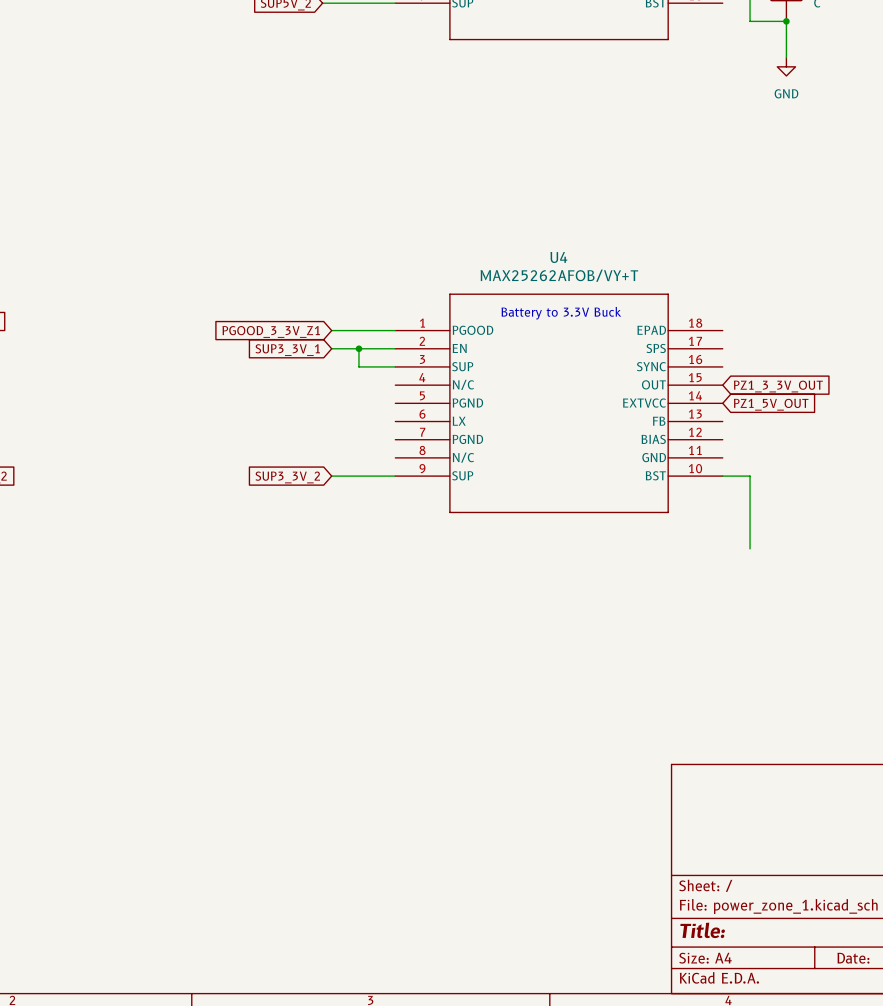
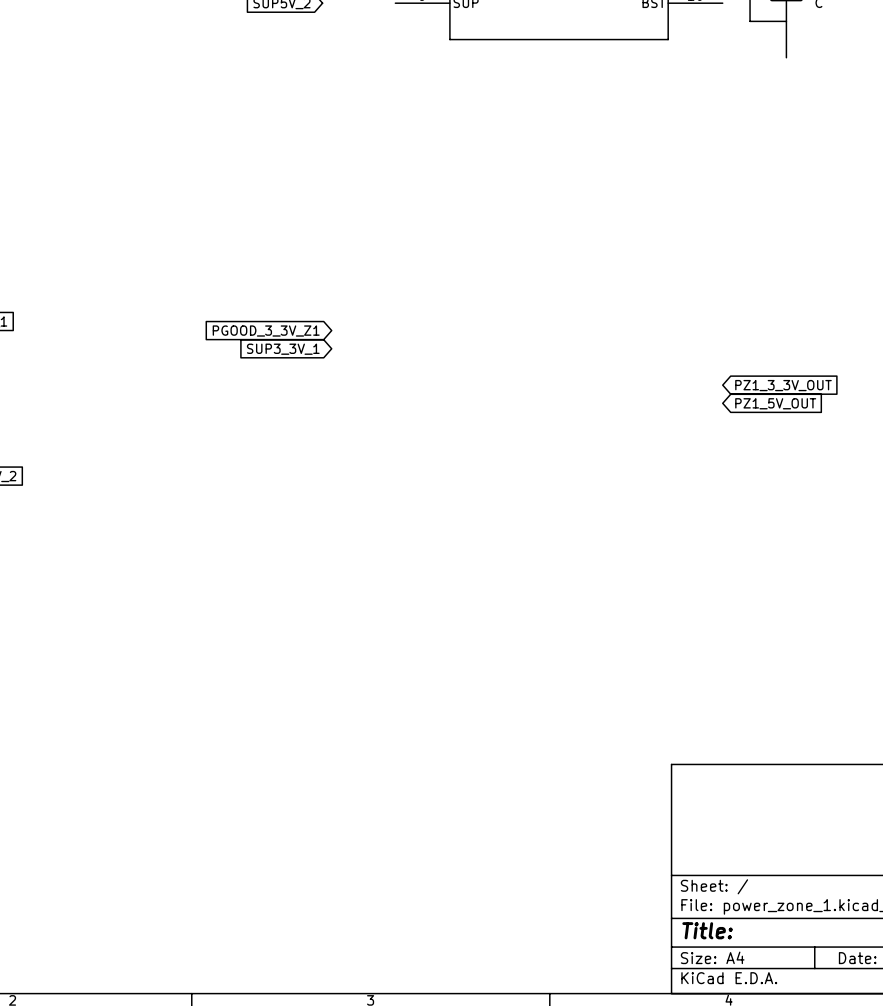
wire: (322, 3) (395, 3) -> none
junction: (786, 21) -> none
power symbol: GND (786, 66) -> none
text: Battery to 3.3V Buck (561, 313) -> none
wire: (331, 330) (395, 330) -> none
wire: (331, 348) (395, 348) -> none
wire: (358, 348) (358, 366) (395, 366) -> none
junction: (358, 348) -> none
U4: MAX25262AFOB/VY+T (559, 403) -> none
wire: (331, 476) (395, 476) -> none
wire: (722, 476) (750, 476) (750, 548) -> none
global label: SUP3_3V_2 (287, 477) -> none

